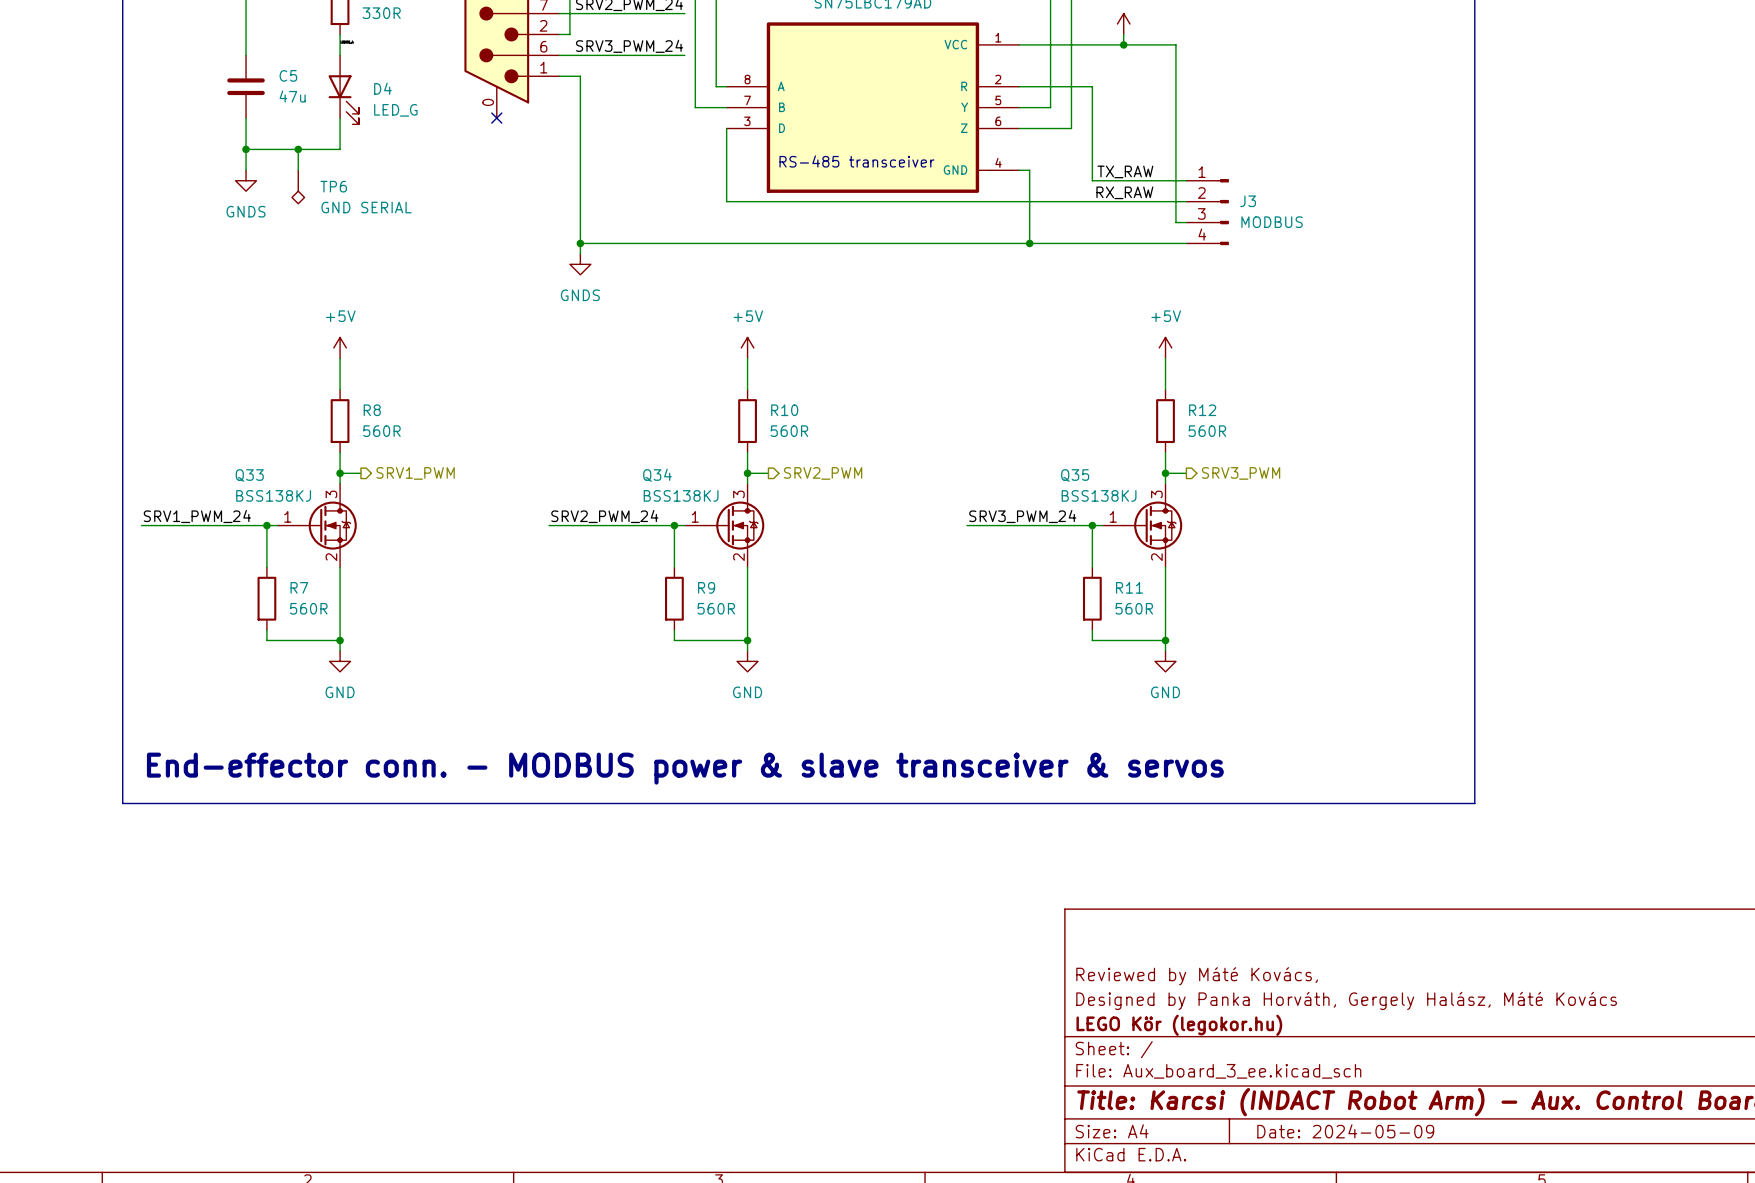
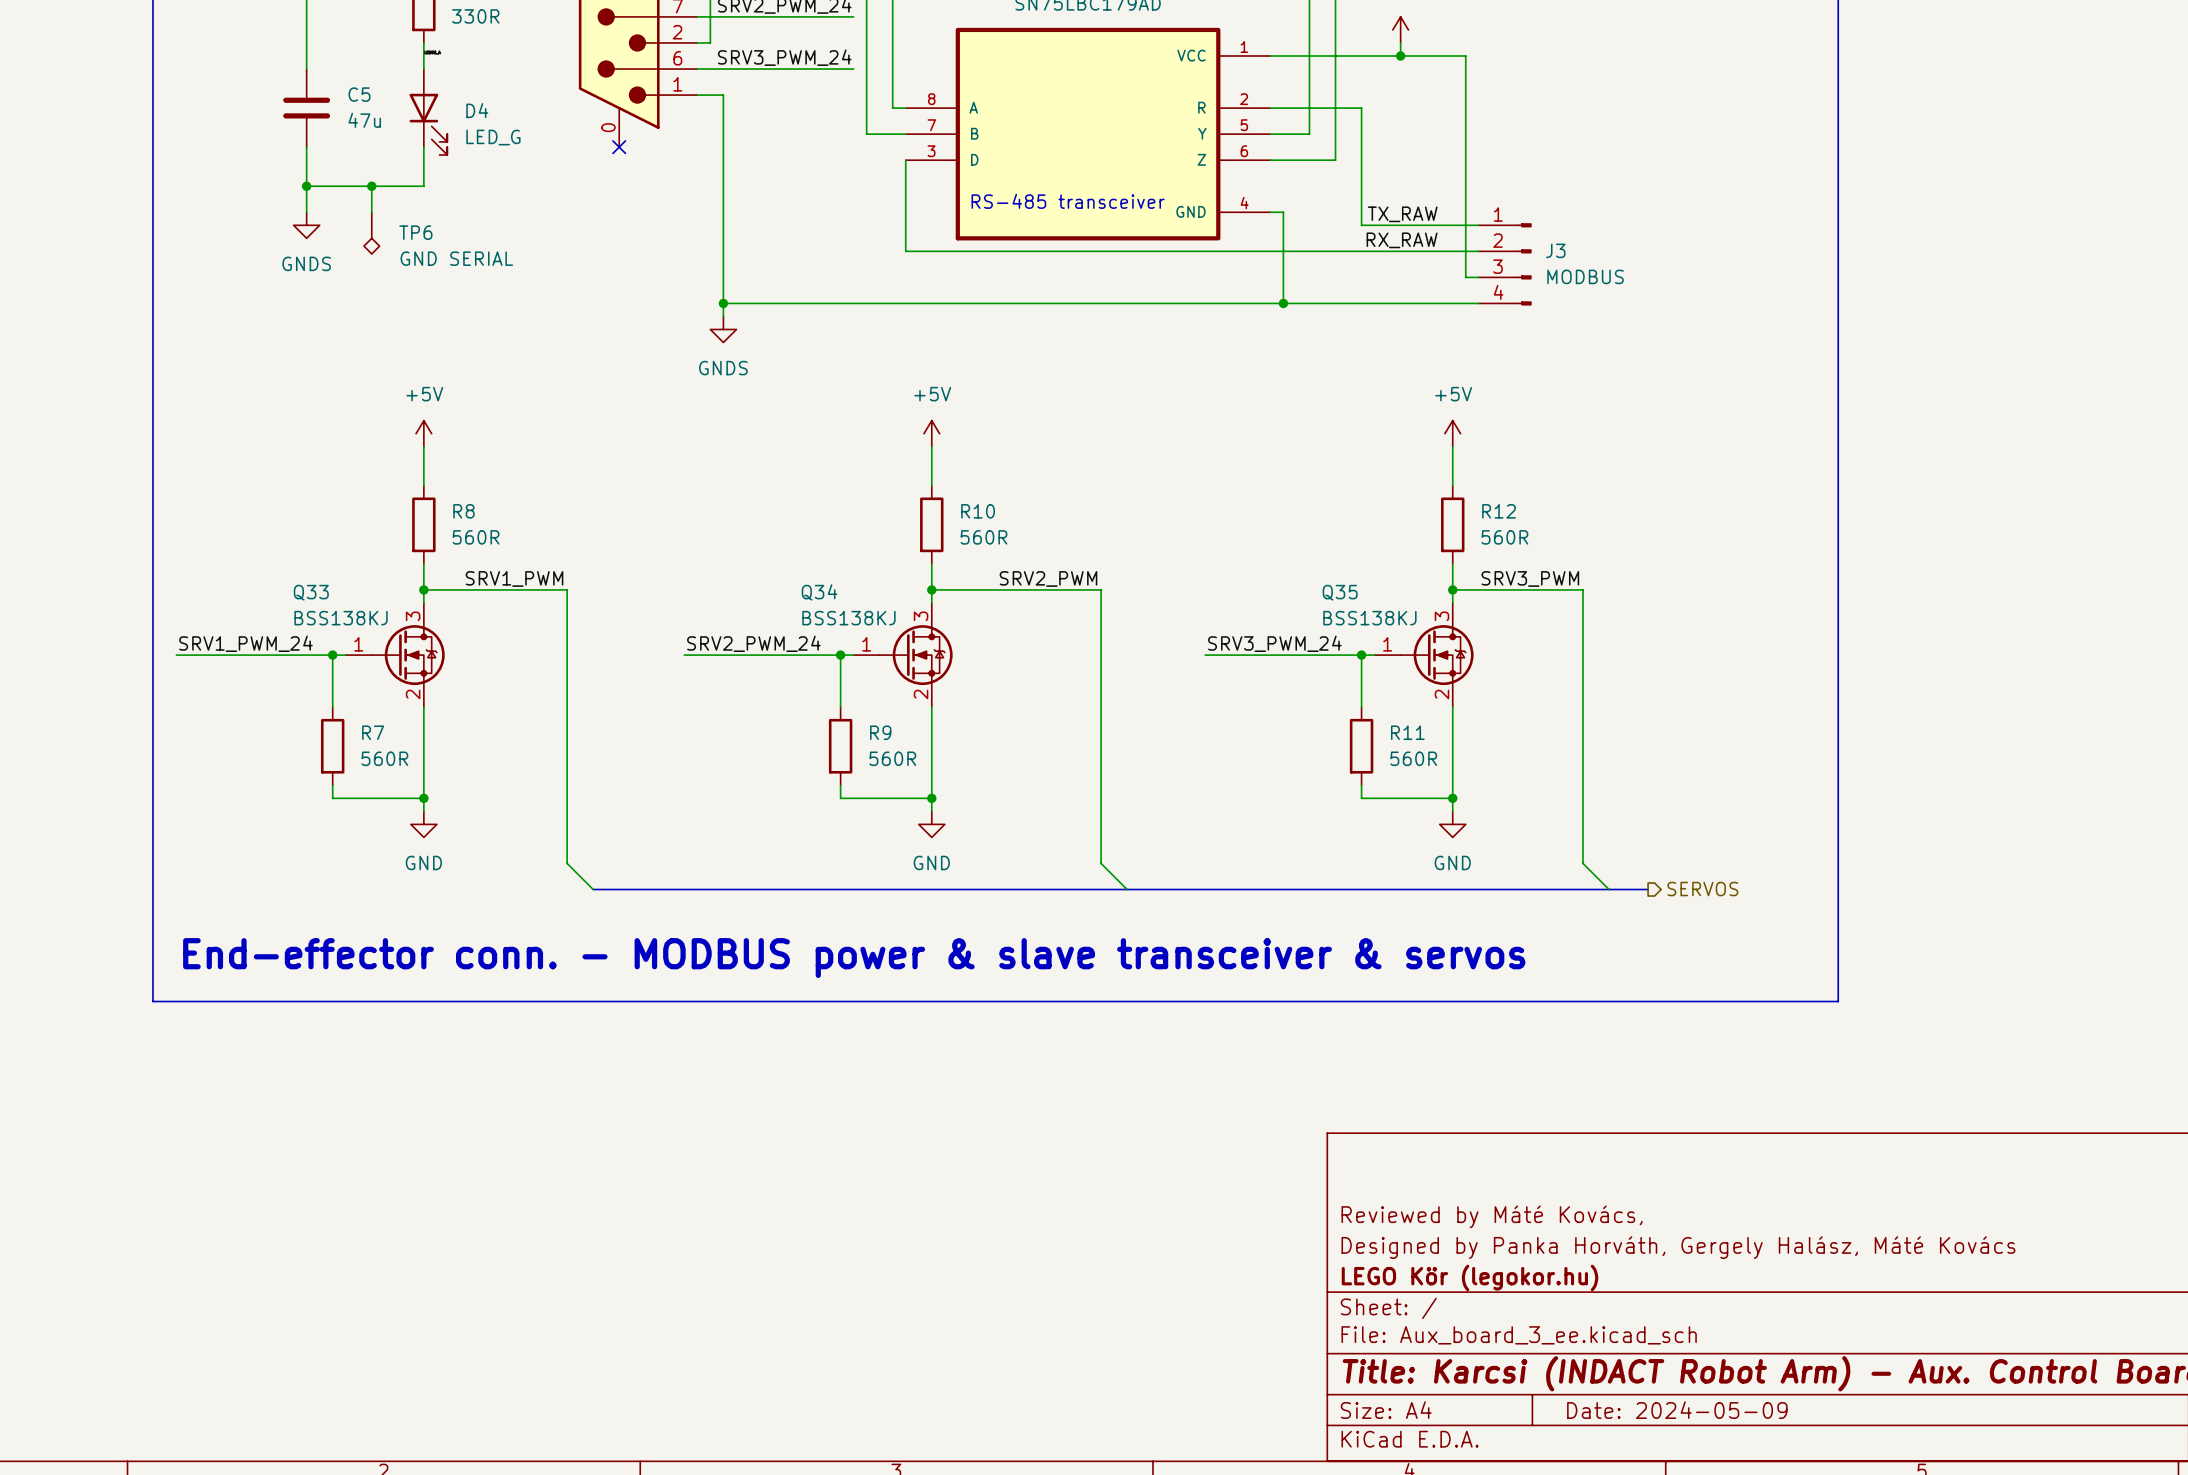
label: none -> SRV1_PWM (514, 578)
label: none -> SRV2_PWM (1048, 578)
label: none -> SRV3_PWM (1530, 578)
wire: none -> (449, 589) (567, 589) (567, 863) (593, 889)
hierarchical label: SRV1_PWM (415, 473) -> none
wire: none -> (957, 589) (1101, 589) (1101, 863) (1127, 889)
hierarchical label: SRV2_PWM (823, 473) -> none
wire: none -> (1478, 589) (1582, 589) (1582, 863) (1609, 889)
hierarchical label: SRV3_PWM (1241, 473) -> none
bus: none -> (593, 889) (1648, 889)
hierarchical label: none -> SERVOS (1702, 889)

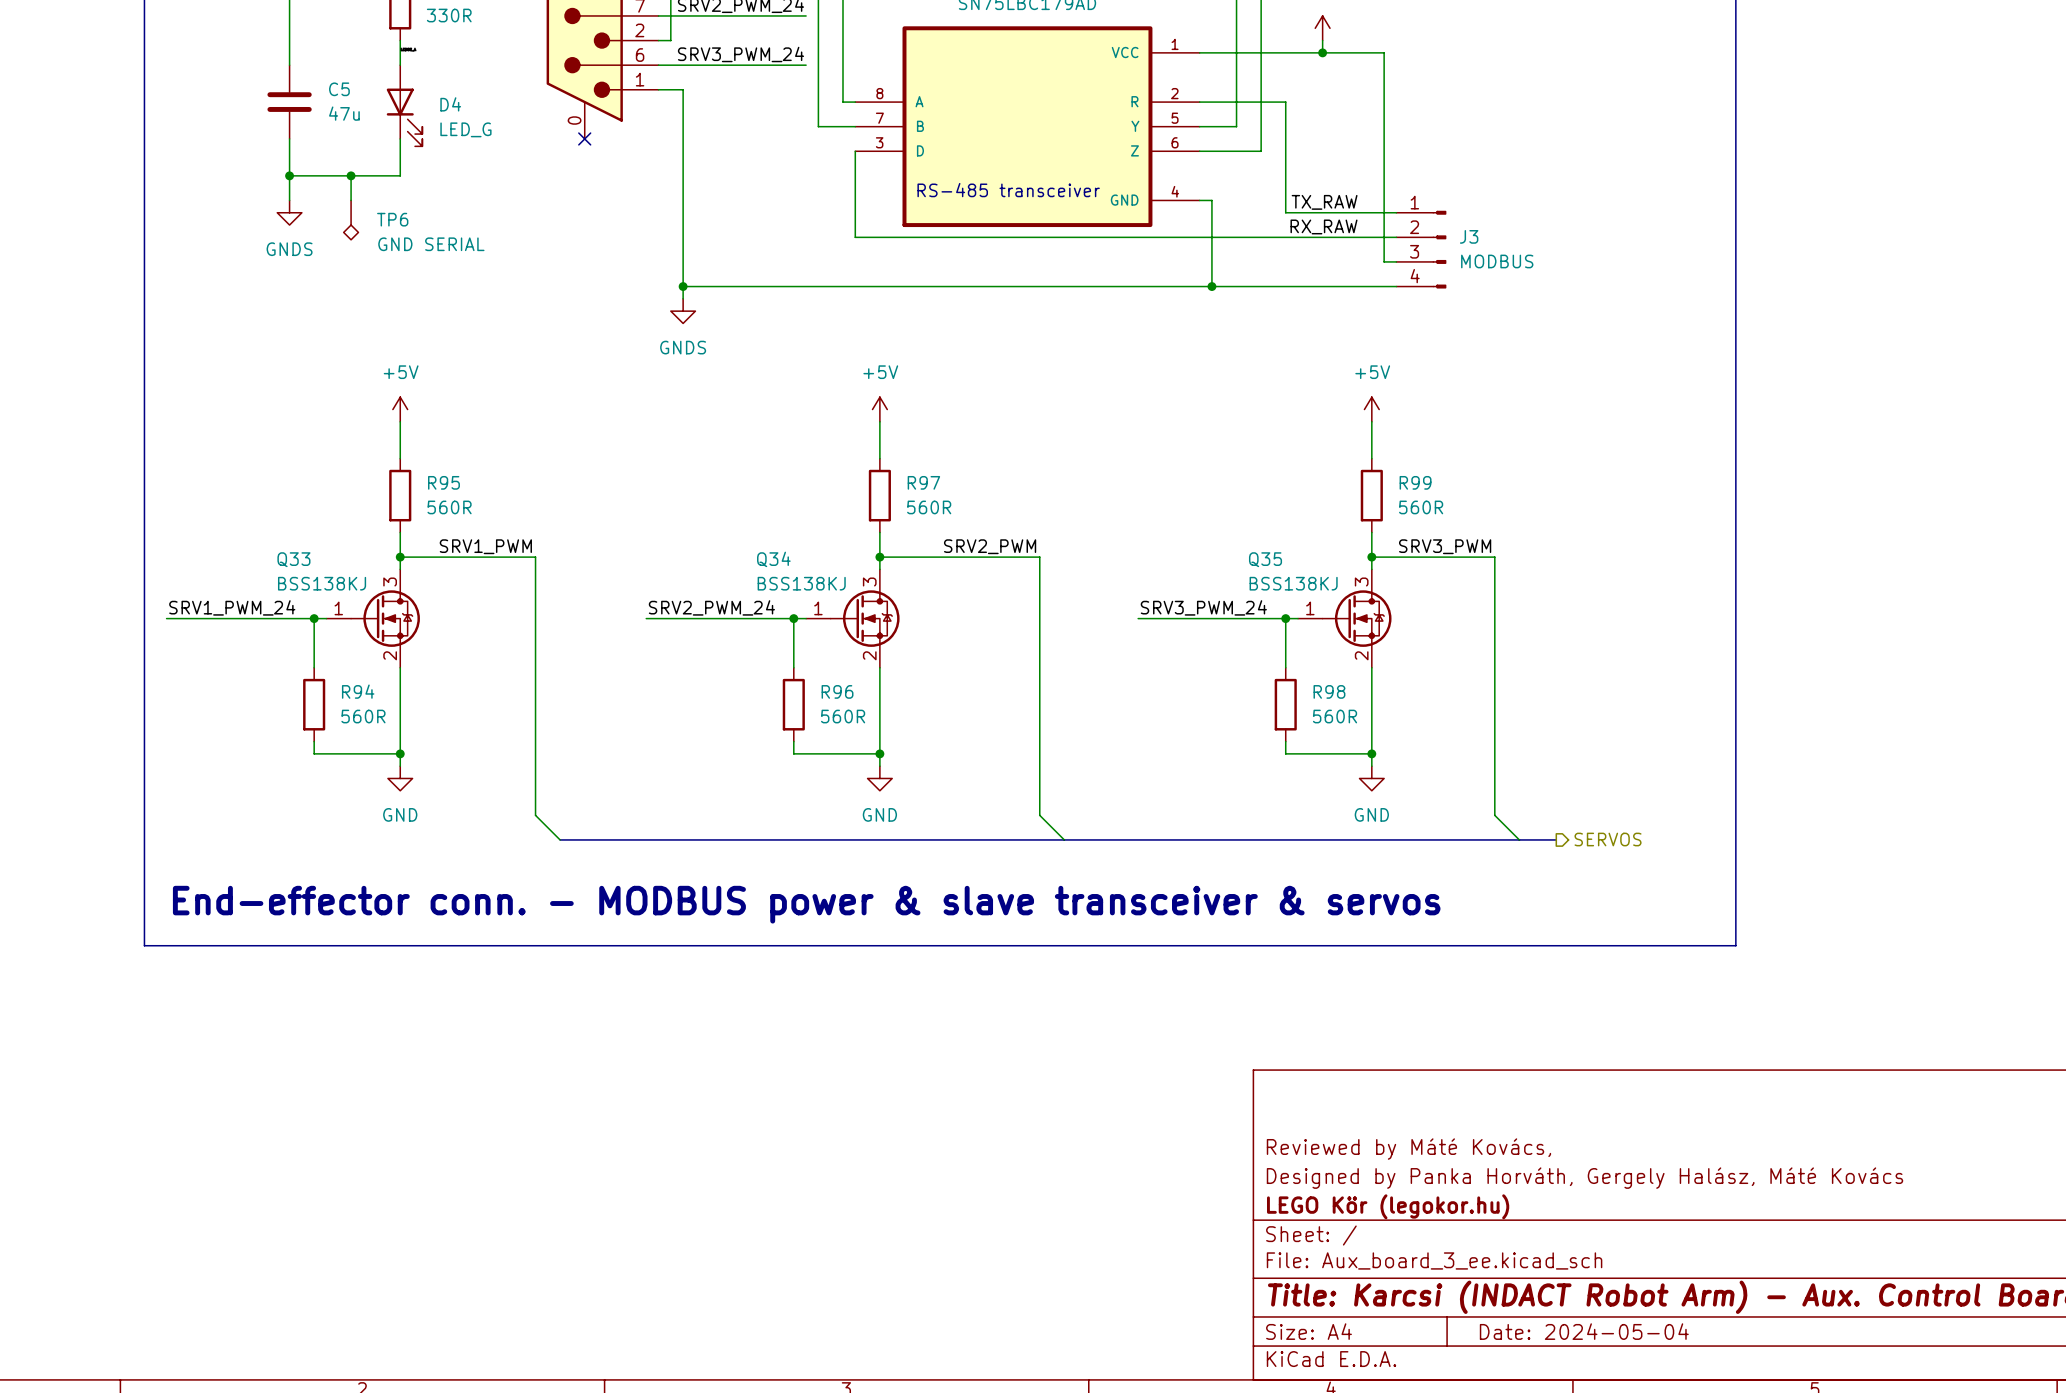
R8 name: R8 (463, 511) -> R95 (443, 482)
R10 name: R10 (978, 511) -> R97 (923, 482)
R12 name: R12 (1499, 511) -> R99 (1415, 482)
R7 name: R7 (373, 732) -> R94 (358, 691)
R9 name: R9 (880, 732) -> R96 (837, 691)
R11 name: R11 (1407, 732) -> R98 (1329, 691)
title block: Date: 2024-05-09 (1677, 1410) -> Date: 2024-05-04 (1584, 1331)

